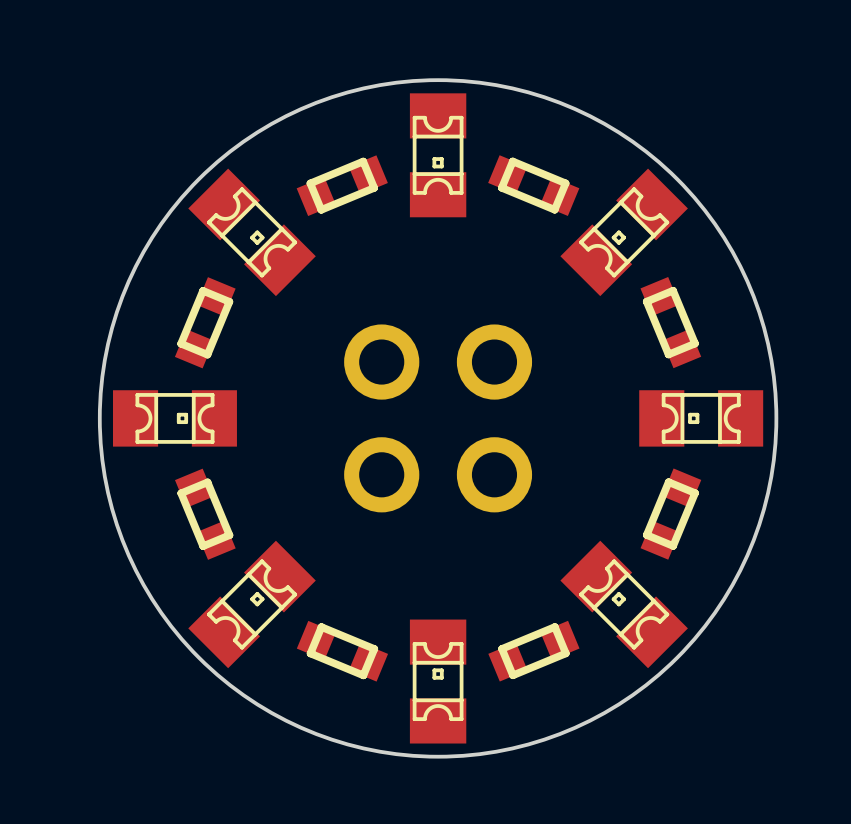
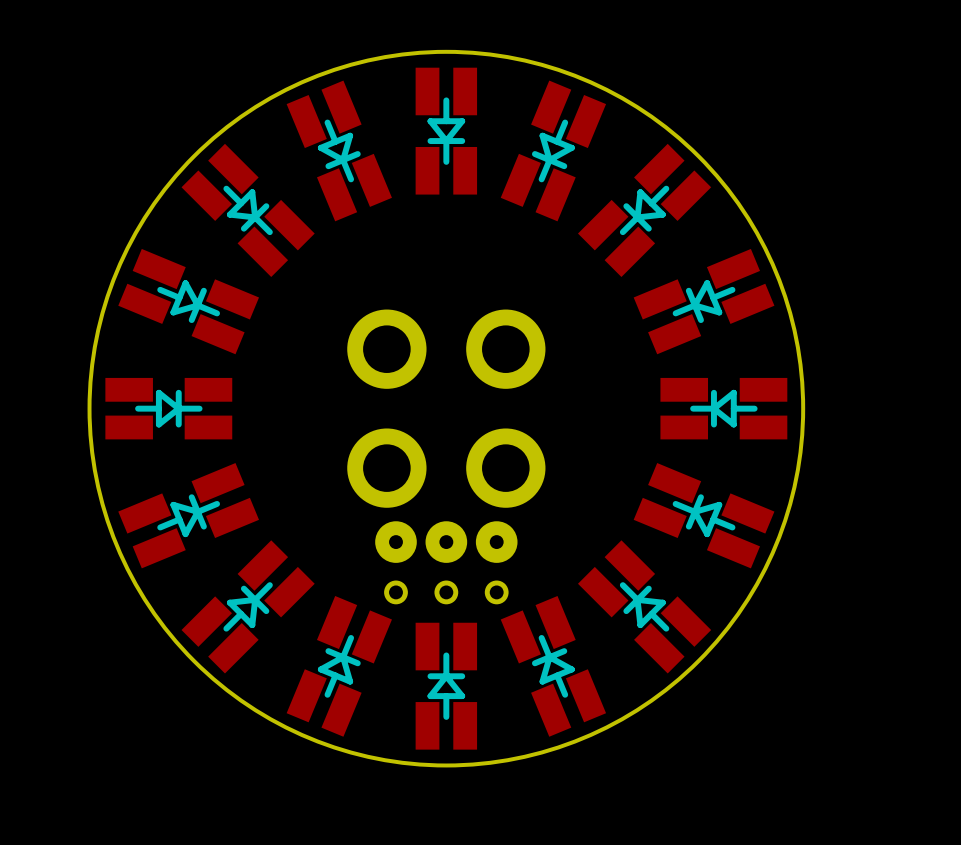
part footprint: [409, 93, 467, 218] -> [415, 67, 478, 195]
part footprint: [296, 155, 388, 217] -> [286, 80, 392, 222]
part footprint: [488, 155, 580, 216] -> [500, 80, 607, 222]
part footprint: [188, 168, 316, 297] -> [181, 143, 315, 278]
part footprint: [560, 168, 688, 297] -> [578, 143, 712, 278]
part footprint: [640, 276, 702, 369] -> [633, 248, 775, 355]
part footprint: [174, 277, 236, 369] -> [118, 248, 260, 355]
part footprint: [113, 390, 237, 447] -> [105, 377, 233, 440]
part footprint: [639, 390, 764, 447] -> [660, 377, 788, 440]
part footprint: [174, 468, 236, 560] -> [118, 463, 260, 569]
part footprint: [640, 468, 702, 560] -> [633, 463, 775, 569]
part footprint: [188, 540, 316, 669] -> [181, 540, 315, 674]
part footprint: [560, 540, 688, 669] -> [578, 540, 712, 674]
part: none -> (446, 562)
part footprint: [409, 619, 467, 744] -> [415, 622, 478, 750]
part footprint: [296, 620, 389, 682] -> [286, 595, 392, 737]
part footprint: [488, 620, 580, 682] -> [500, 595, 607, 737]

